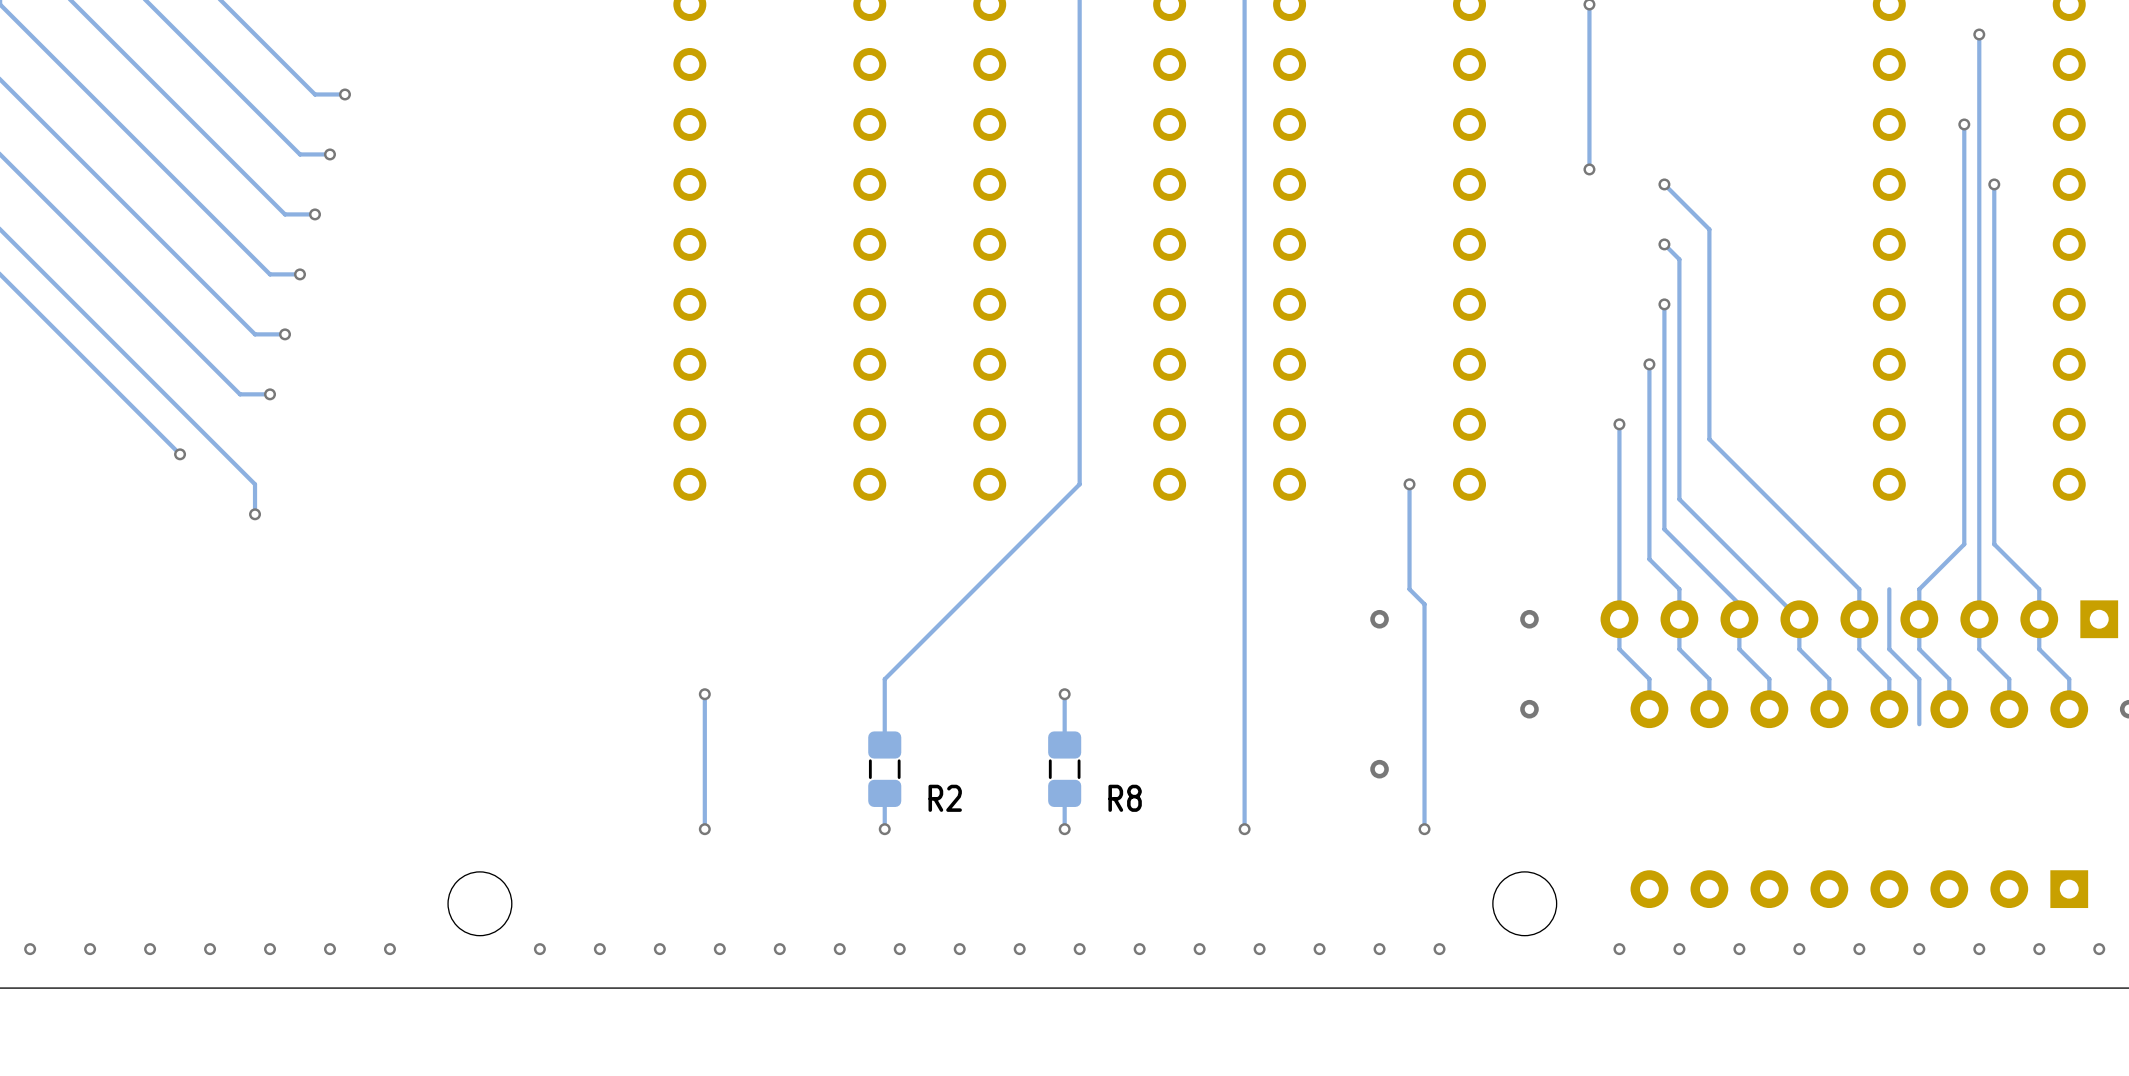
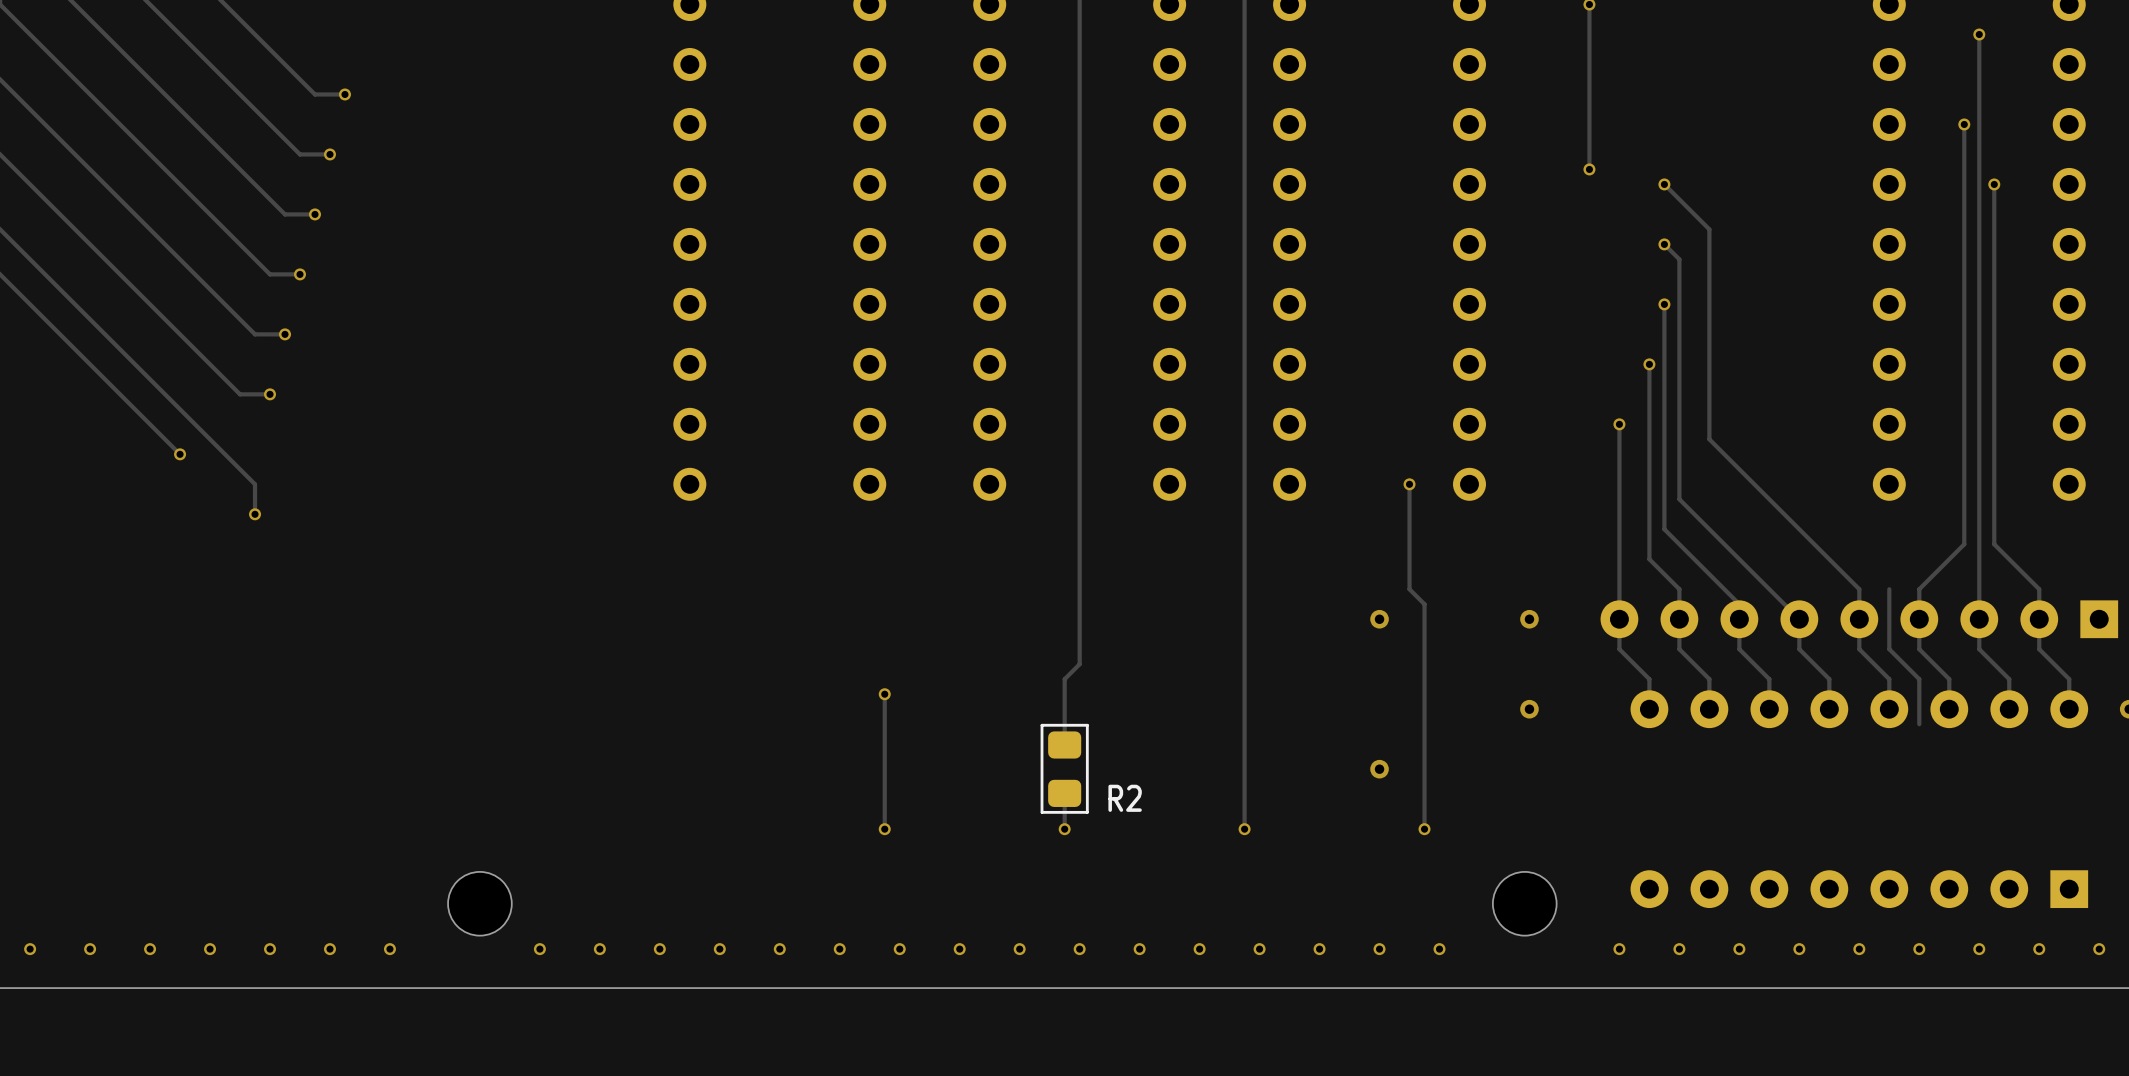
track: (1079, 484) (884, 679) (884, 694) -> (1079, 484) (1079, 664) (1064, 679) (1064, 694)
track: (704, 694) (704, 829) -> none
via: (704, 694) -> none
via: none -> (884, 694)
via: (1064, 694) -> none
R2 footprint: [868, 731, 902, 807] -> [1040, 723, 1089, 814]
track: none -> (884, 739) (884, 784)
R8: (1064, 769) -> none
via: (704, 829) -> none

